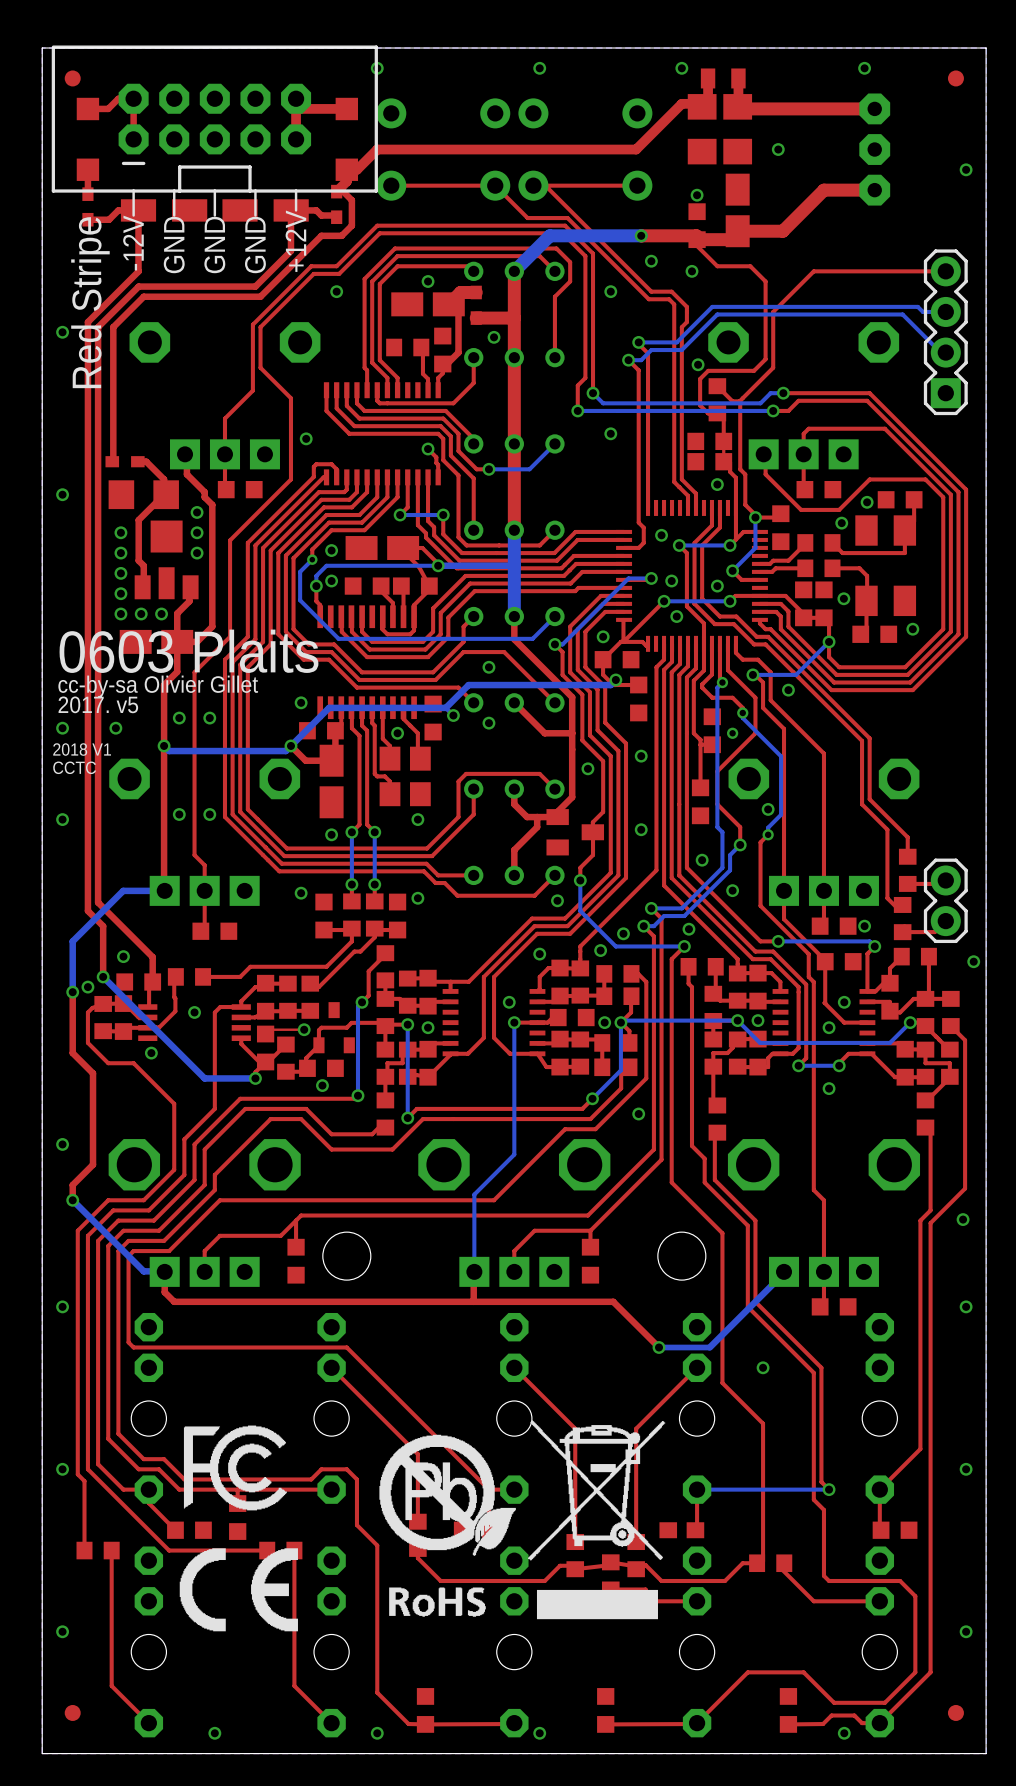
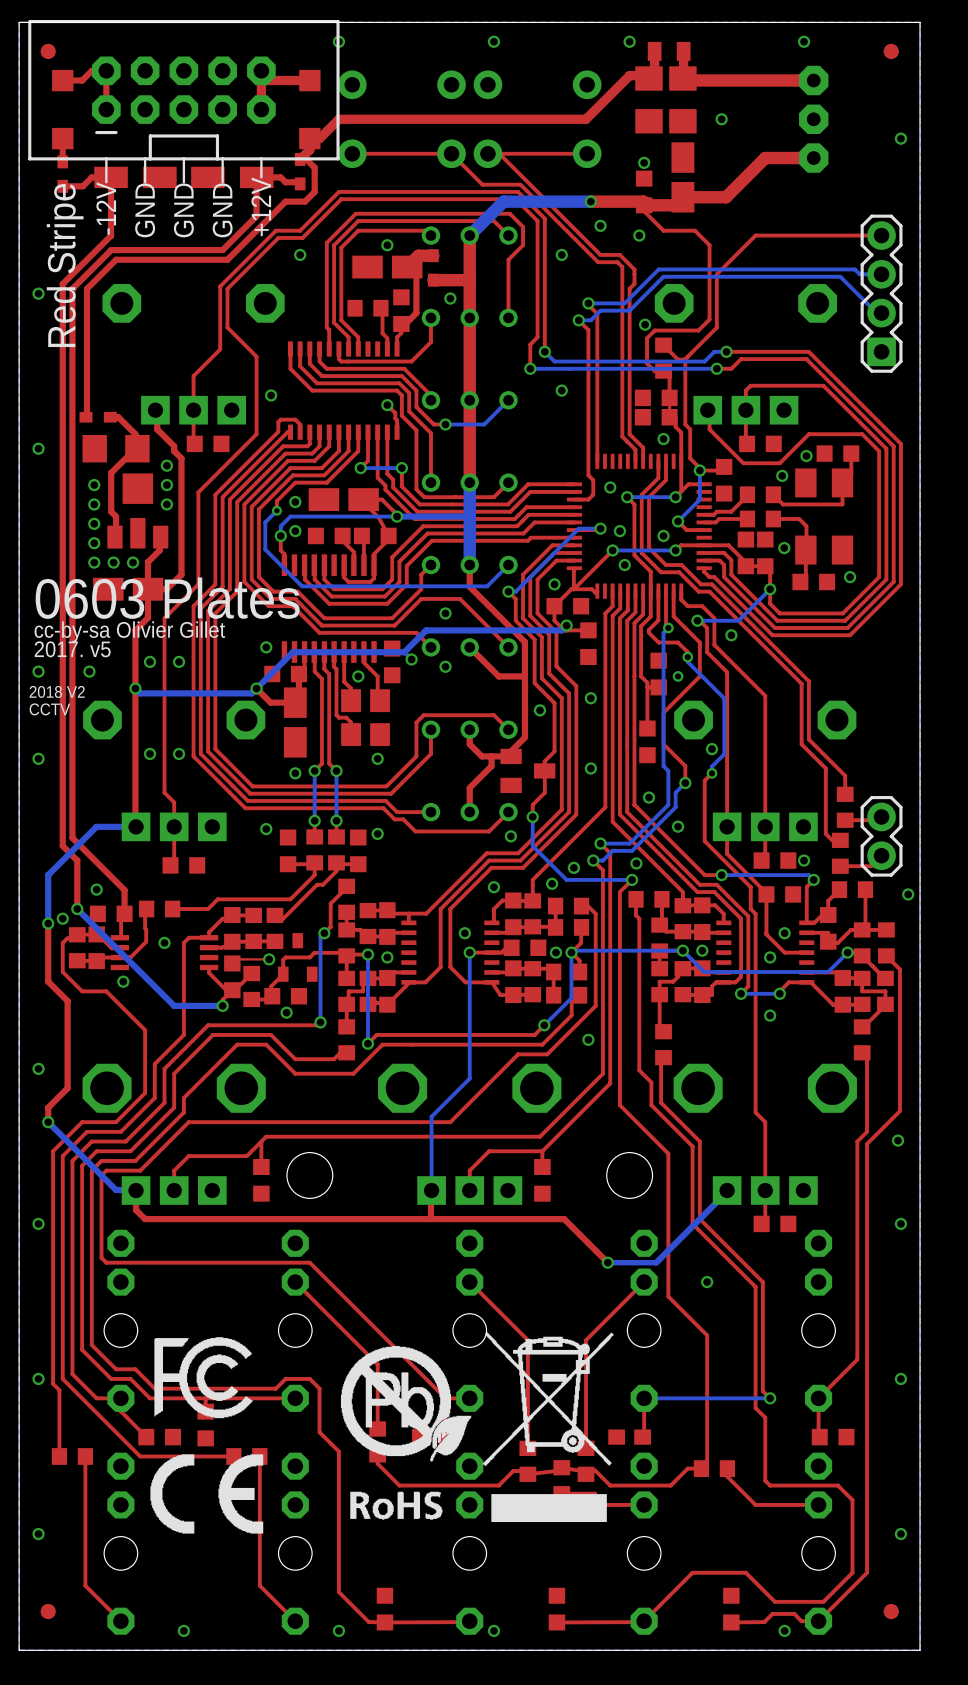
text: 0603 Plaits (188, 651) -> 0603 Plates (167, 598)
text: 2018 V1 (82, 749) -> 2018 V2 (57, 691)
text: CCTC (74, 767) -> CCTV (49, 709)

